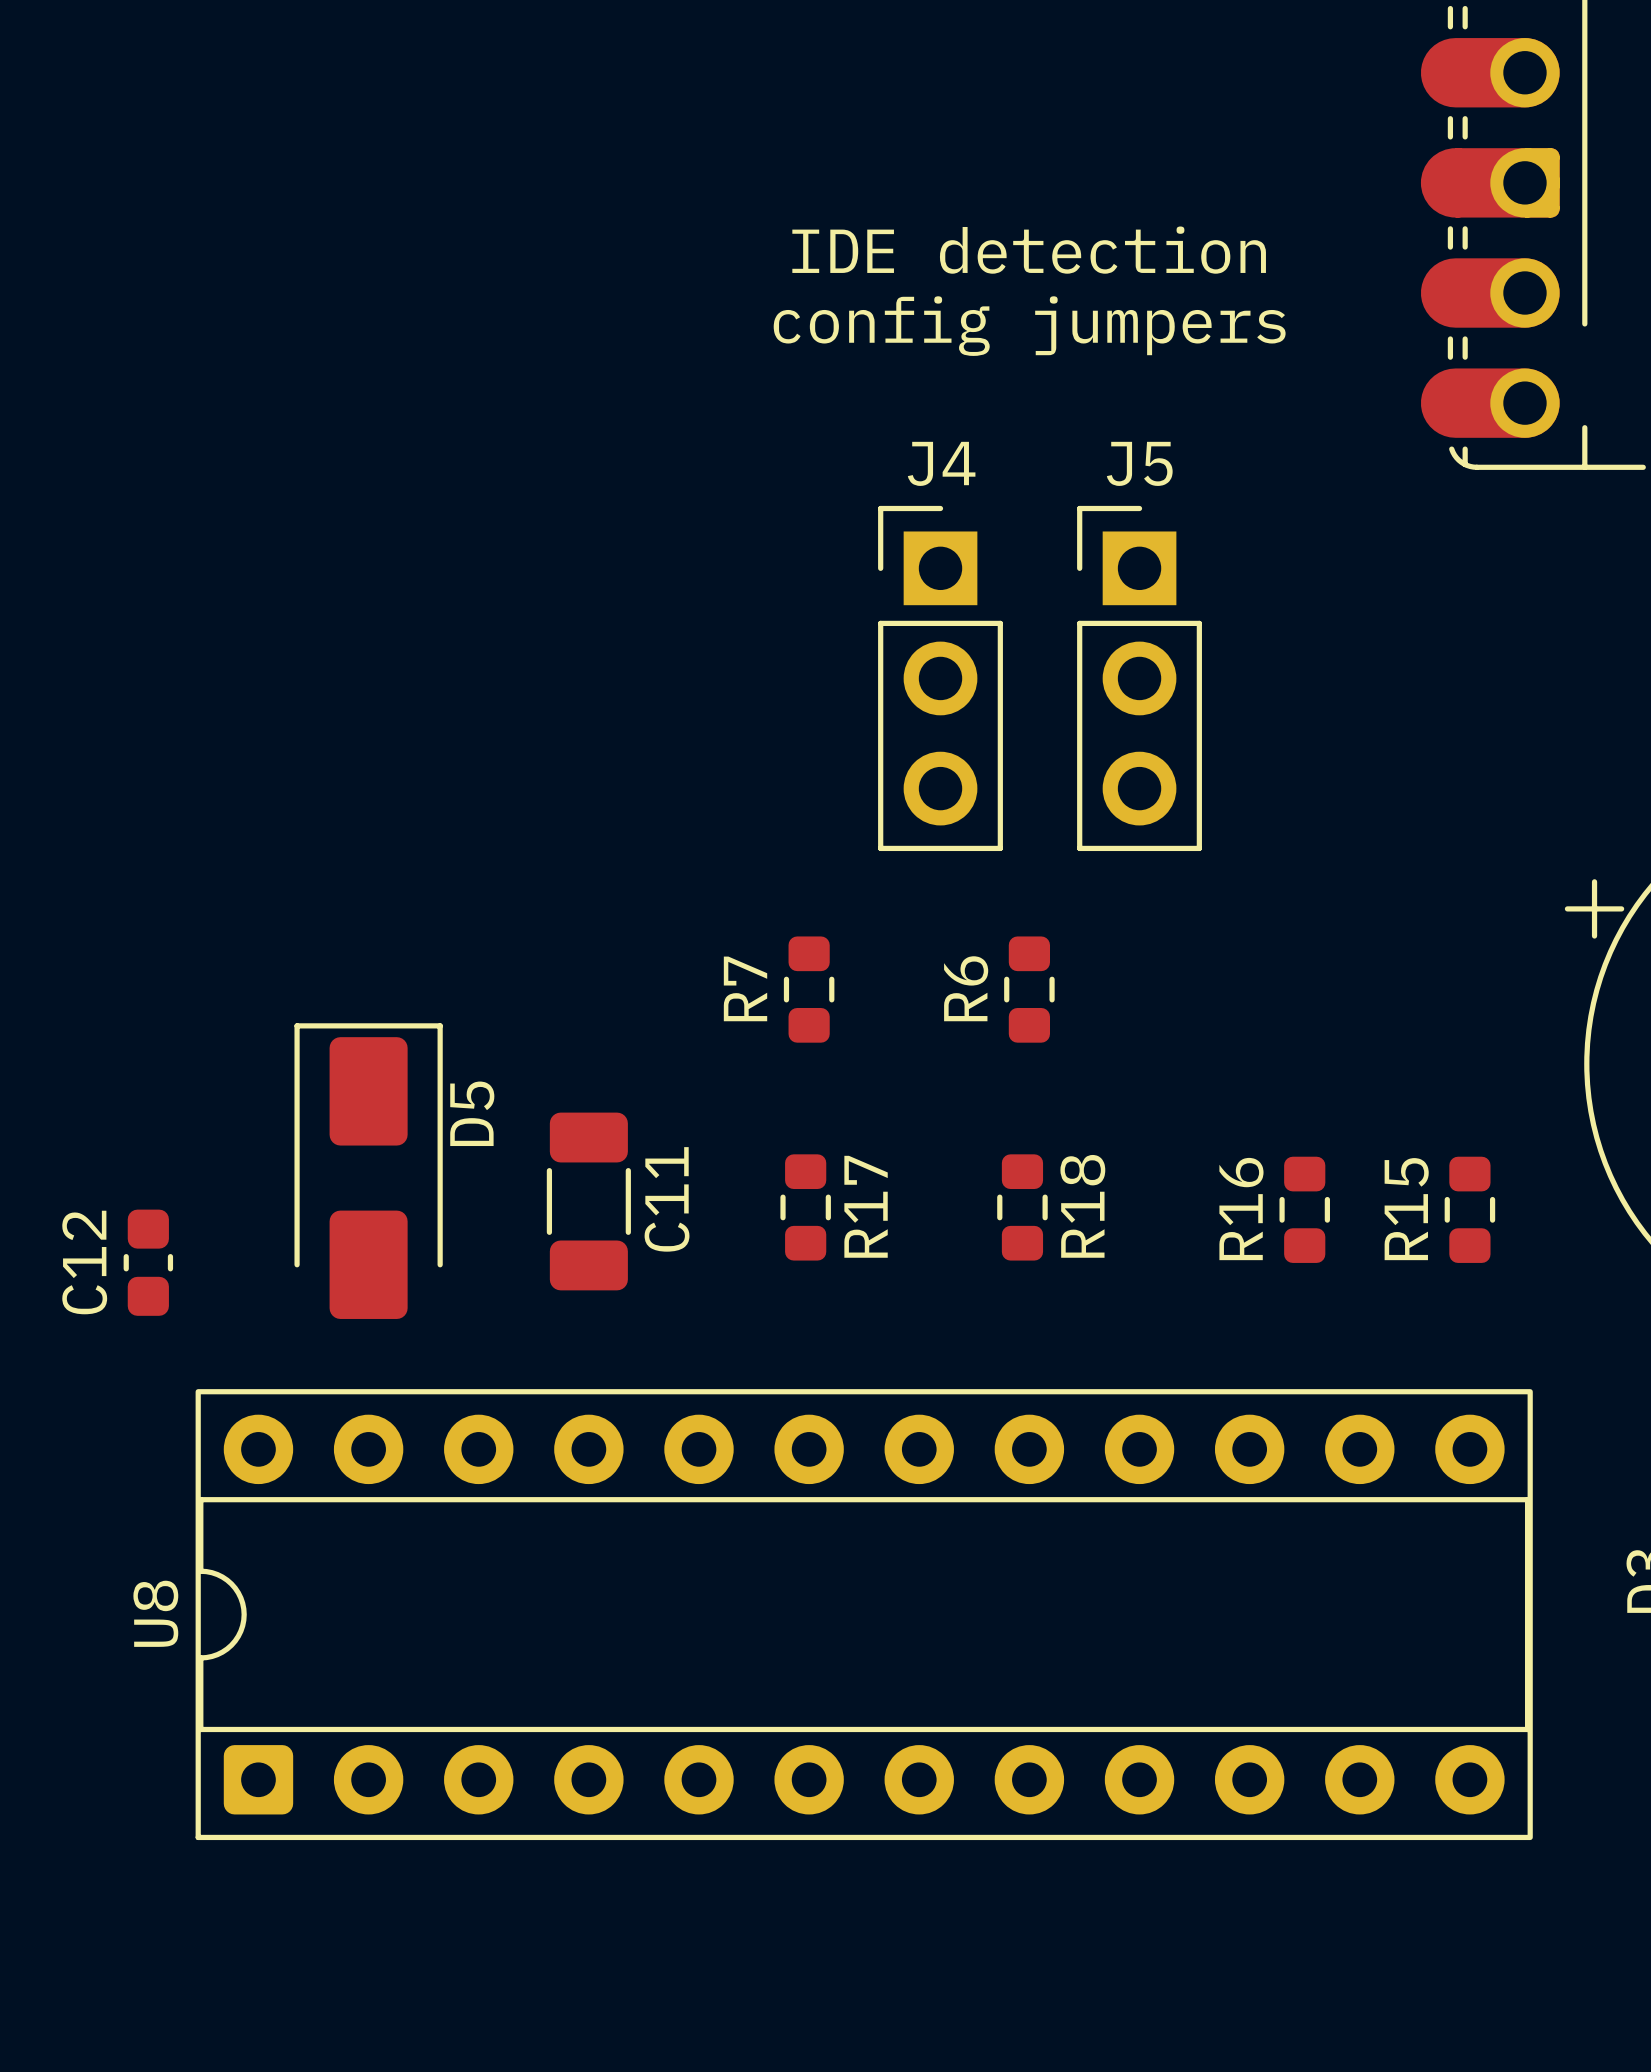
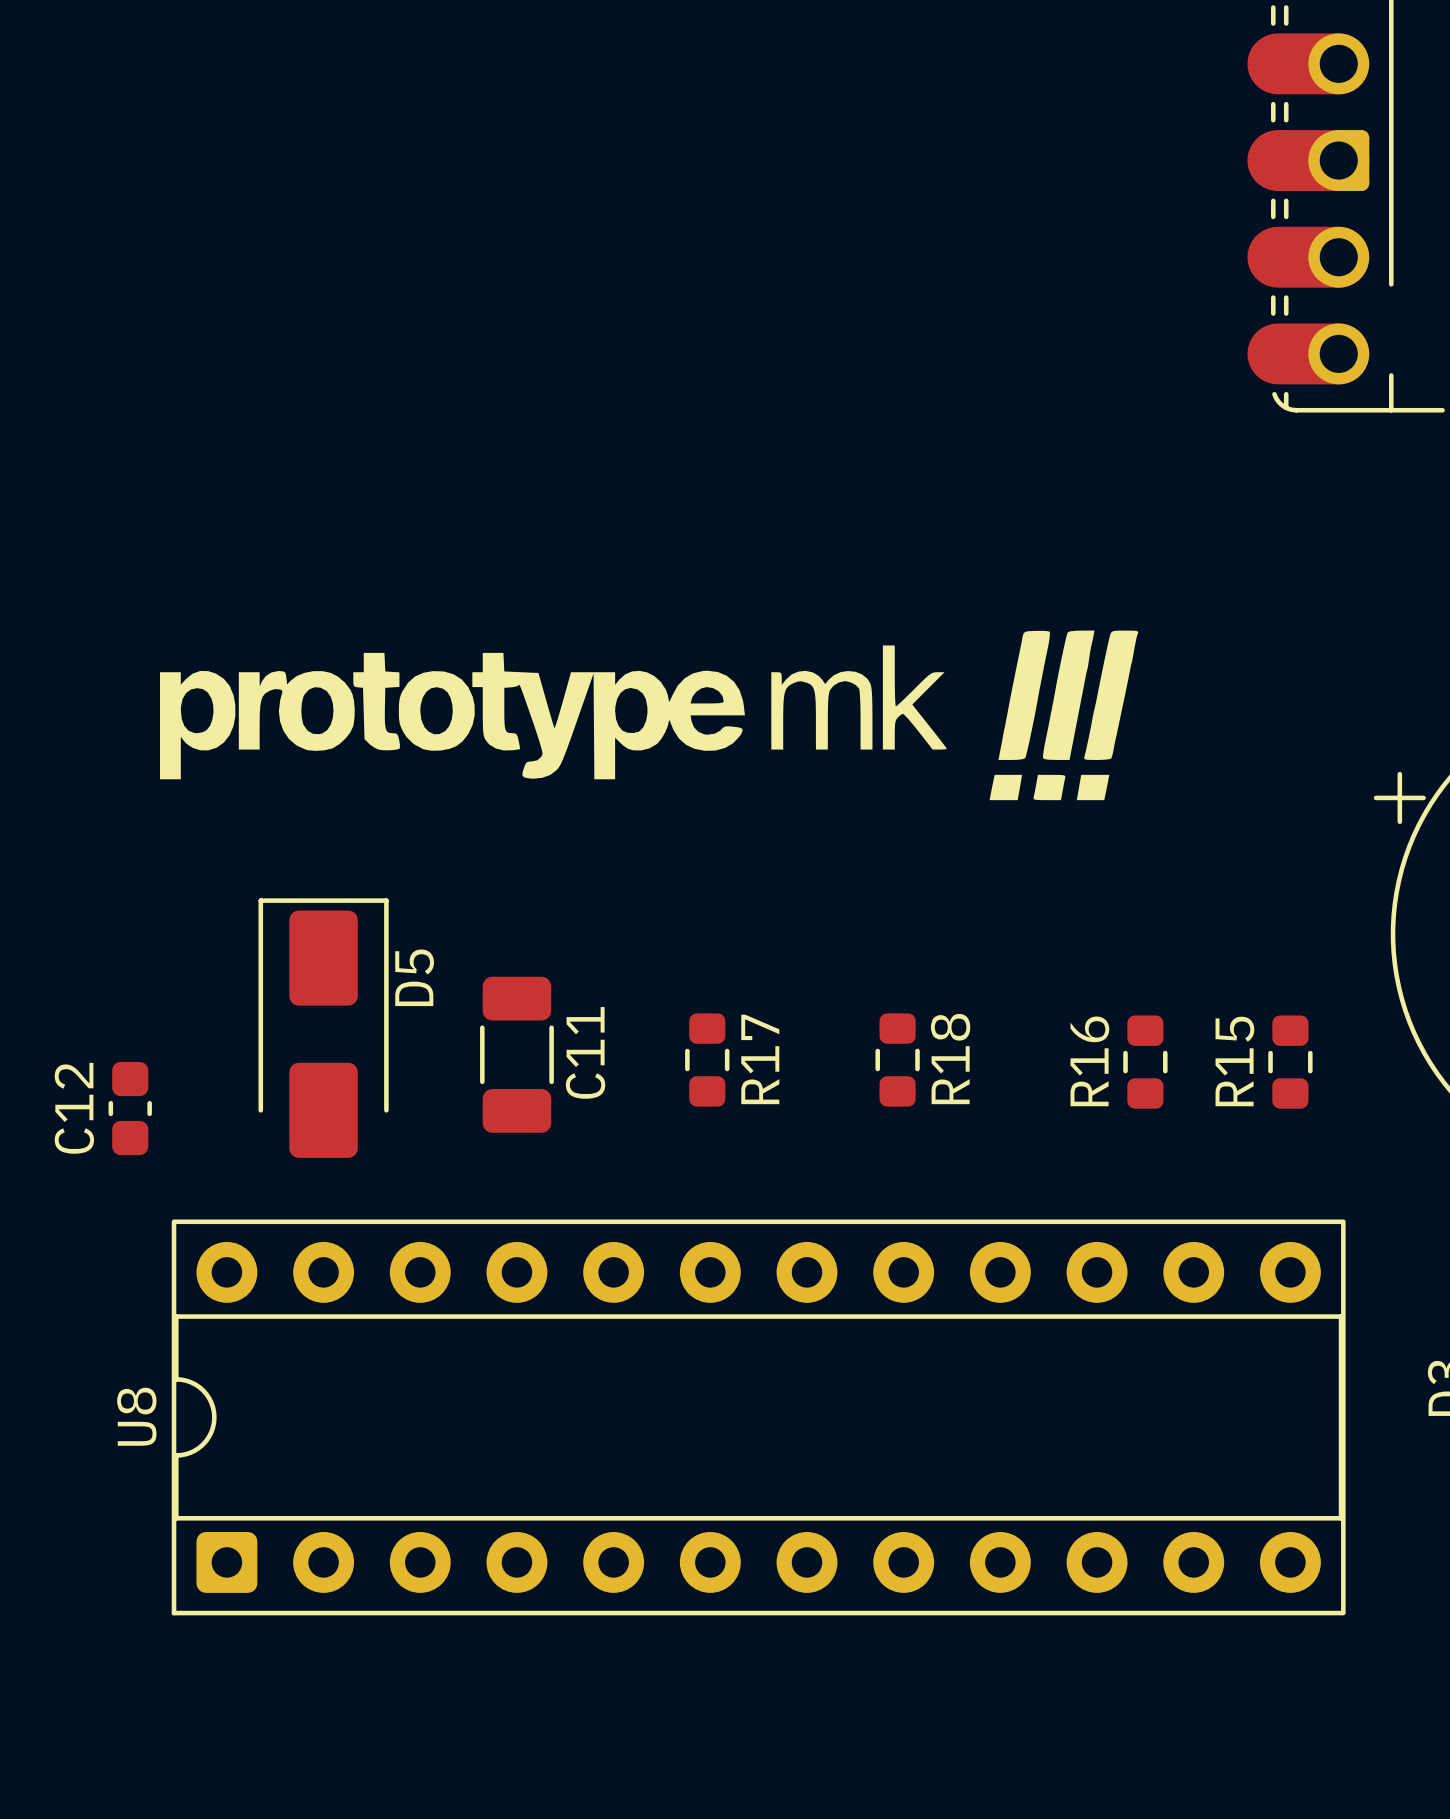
text: IDE detection (1029, 250) -> none
text: config jumpers (1029, 326) -> none
J4: (940, 678) -> none
J5: (1139, 678) -> none
drawing: none -> [159, 630, 1139, 801]
R7: (809, 989) -> none
R6: (1029, 989) -> none

